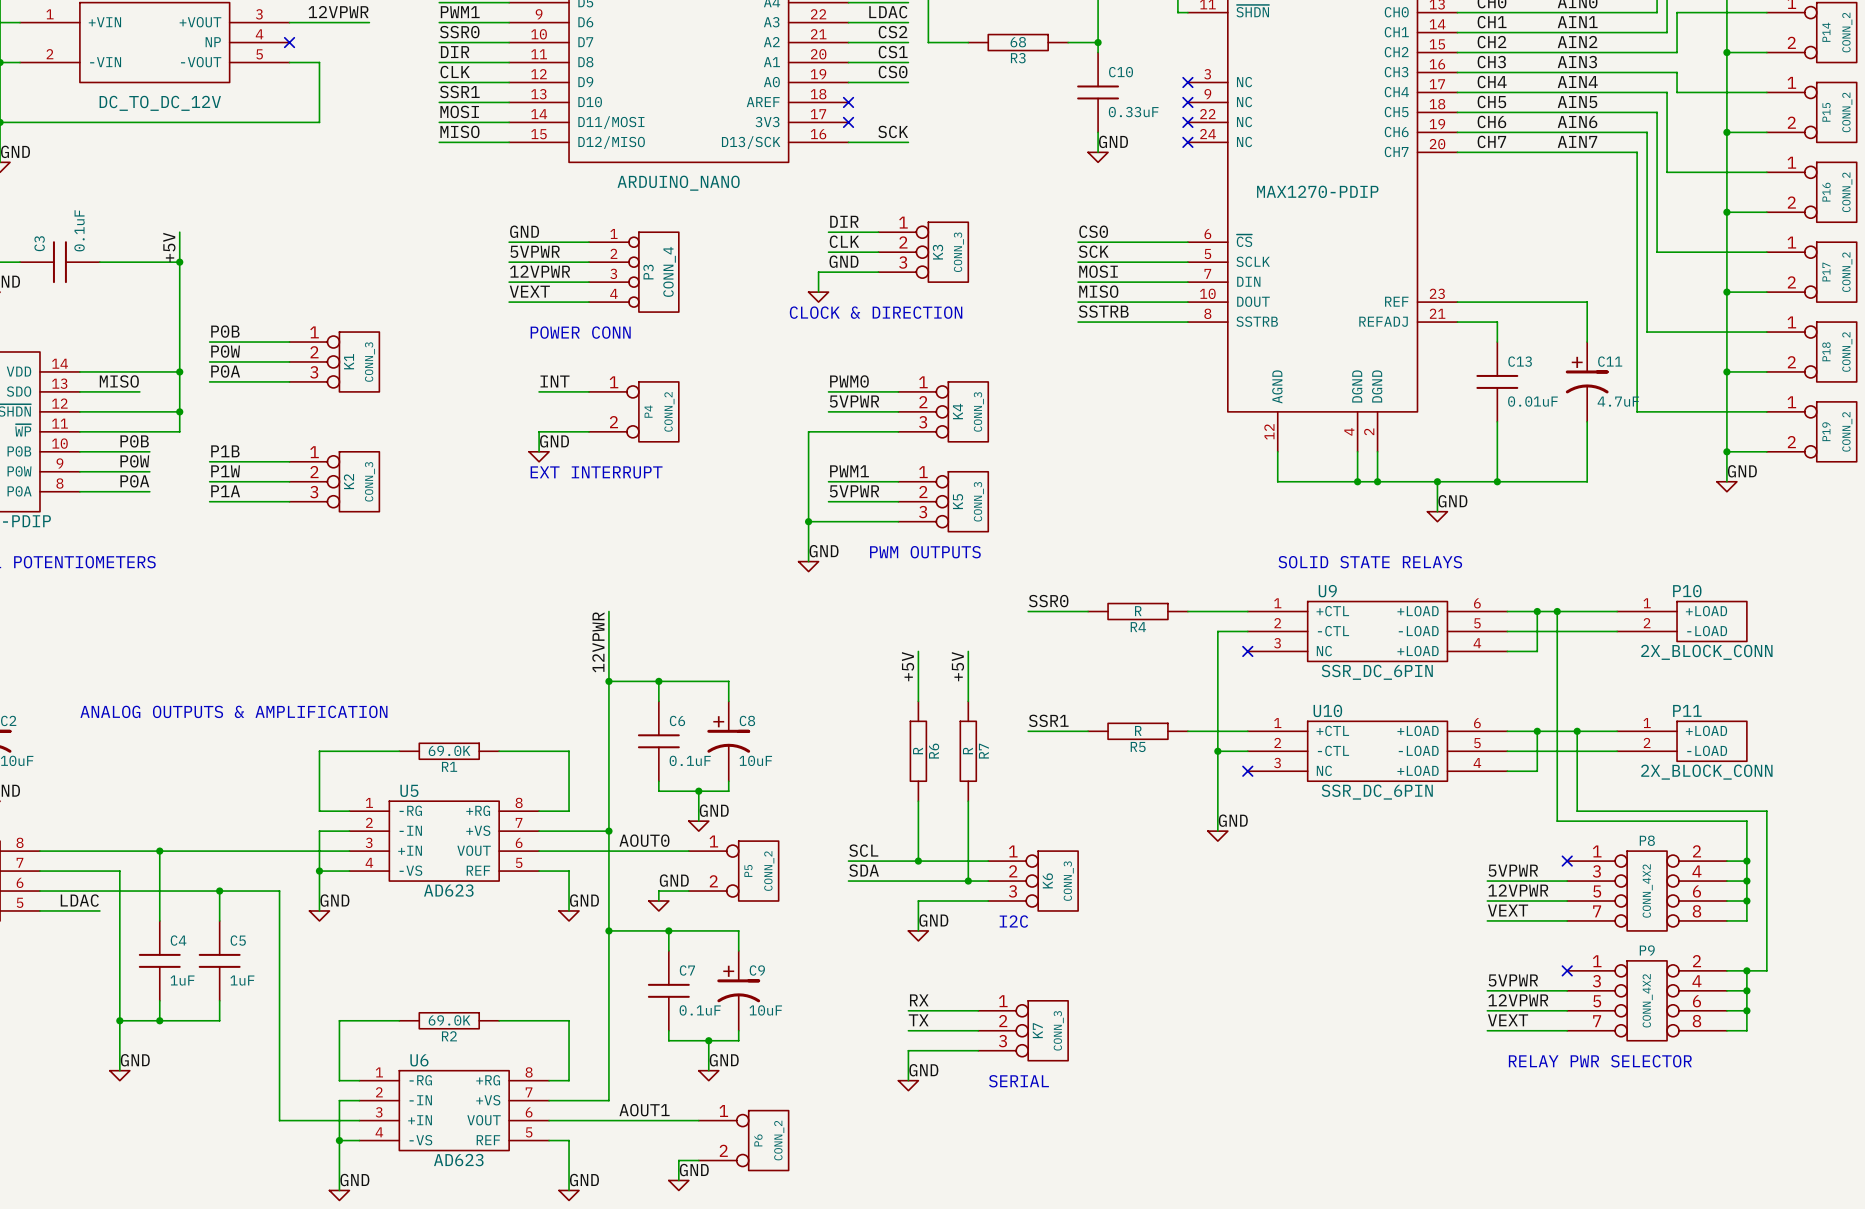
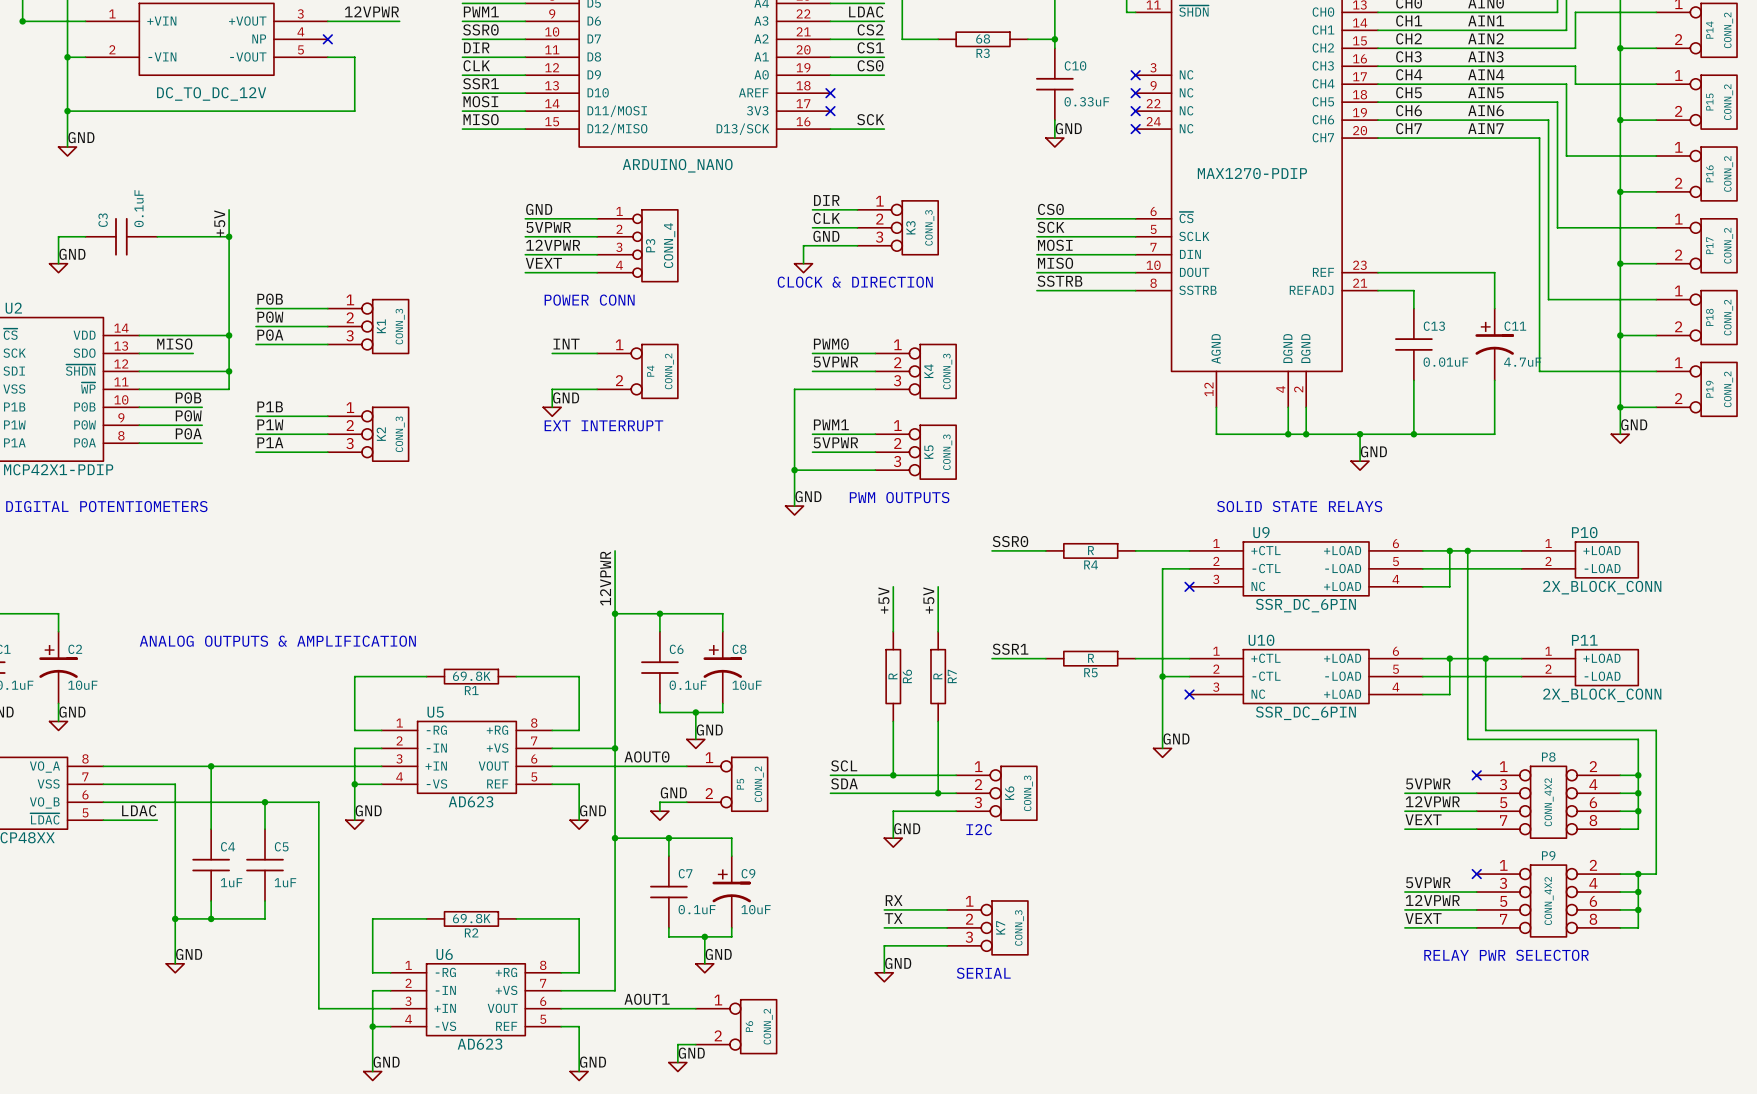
R1 value: 69.0K (449, 750) -> 69.8K (471, 676)
R2 value: 69.0K (449, 1020) -> 69.8K (471, 918)

